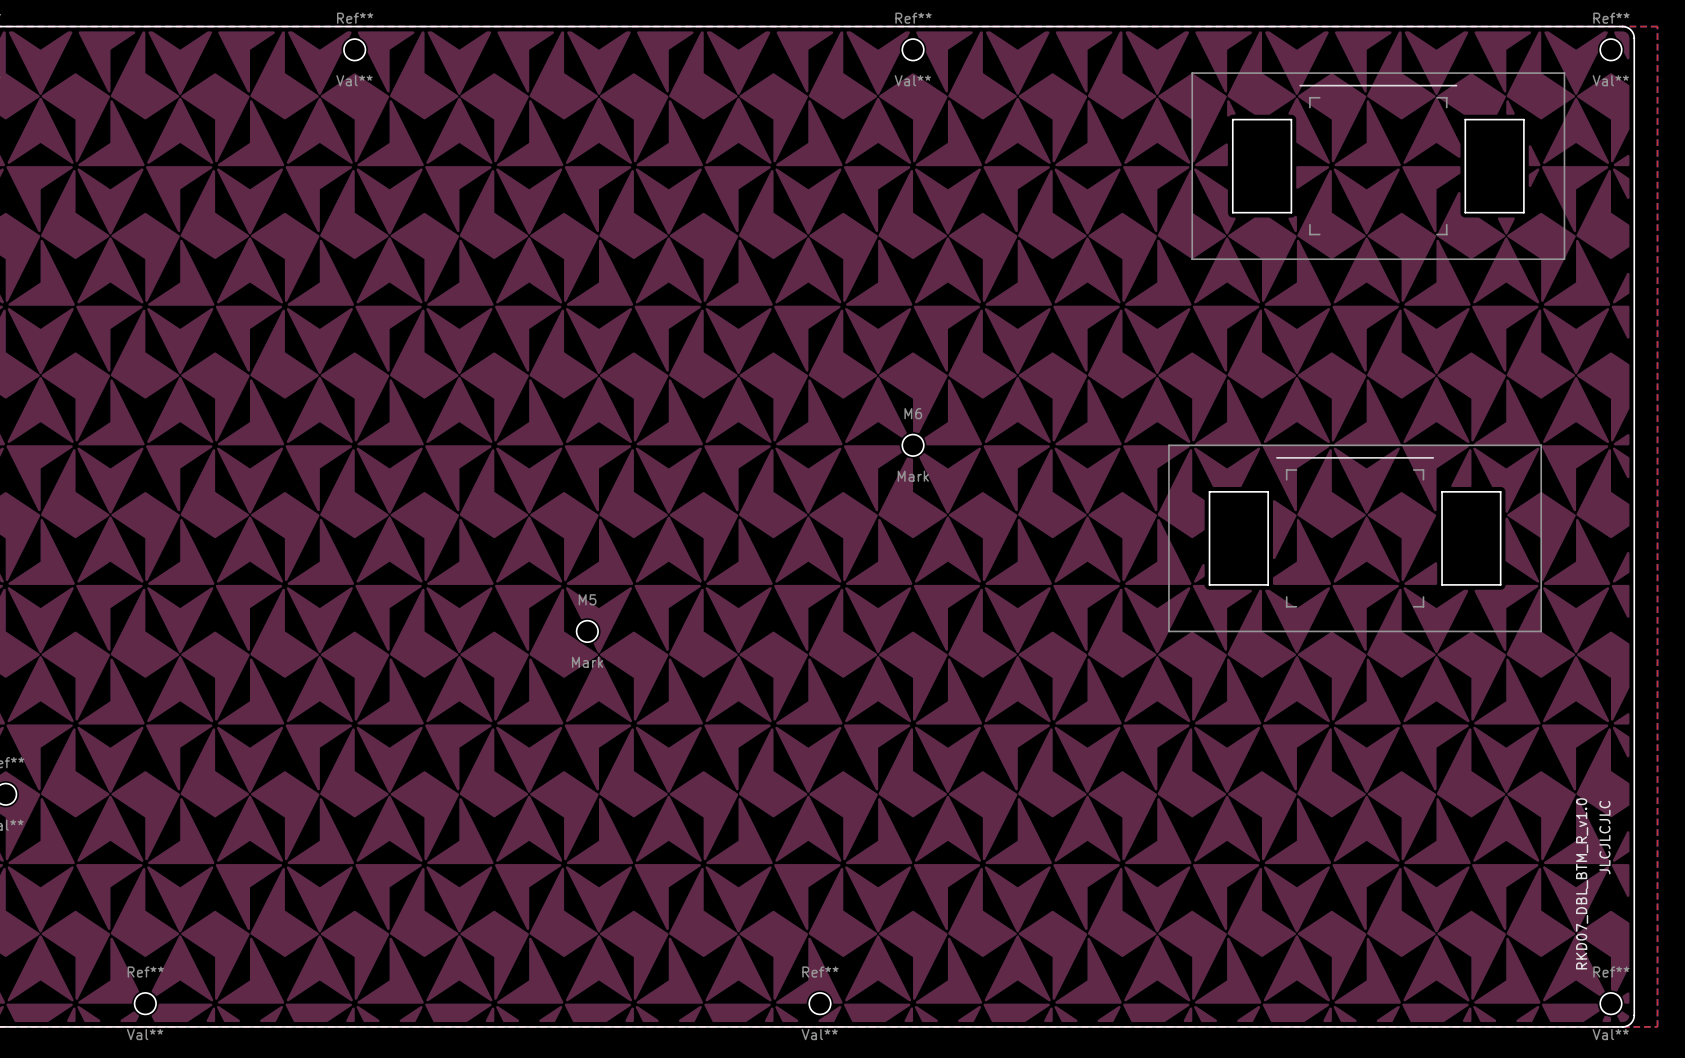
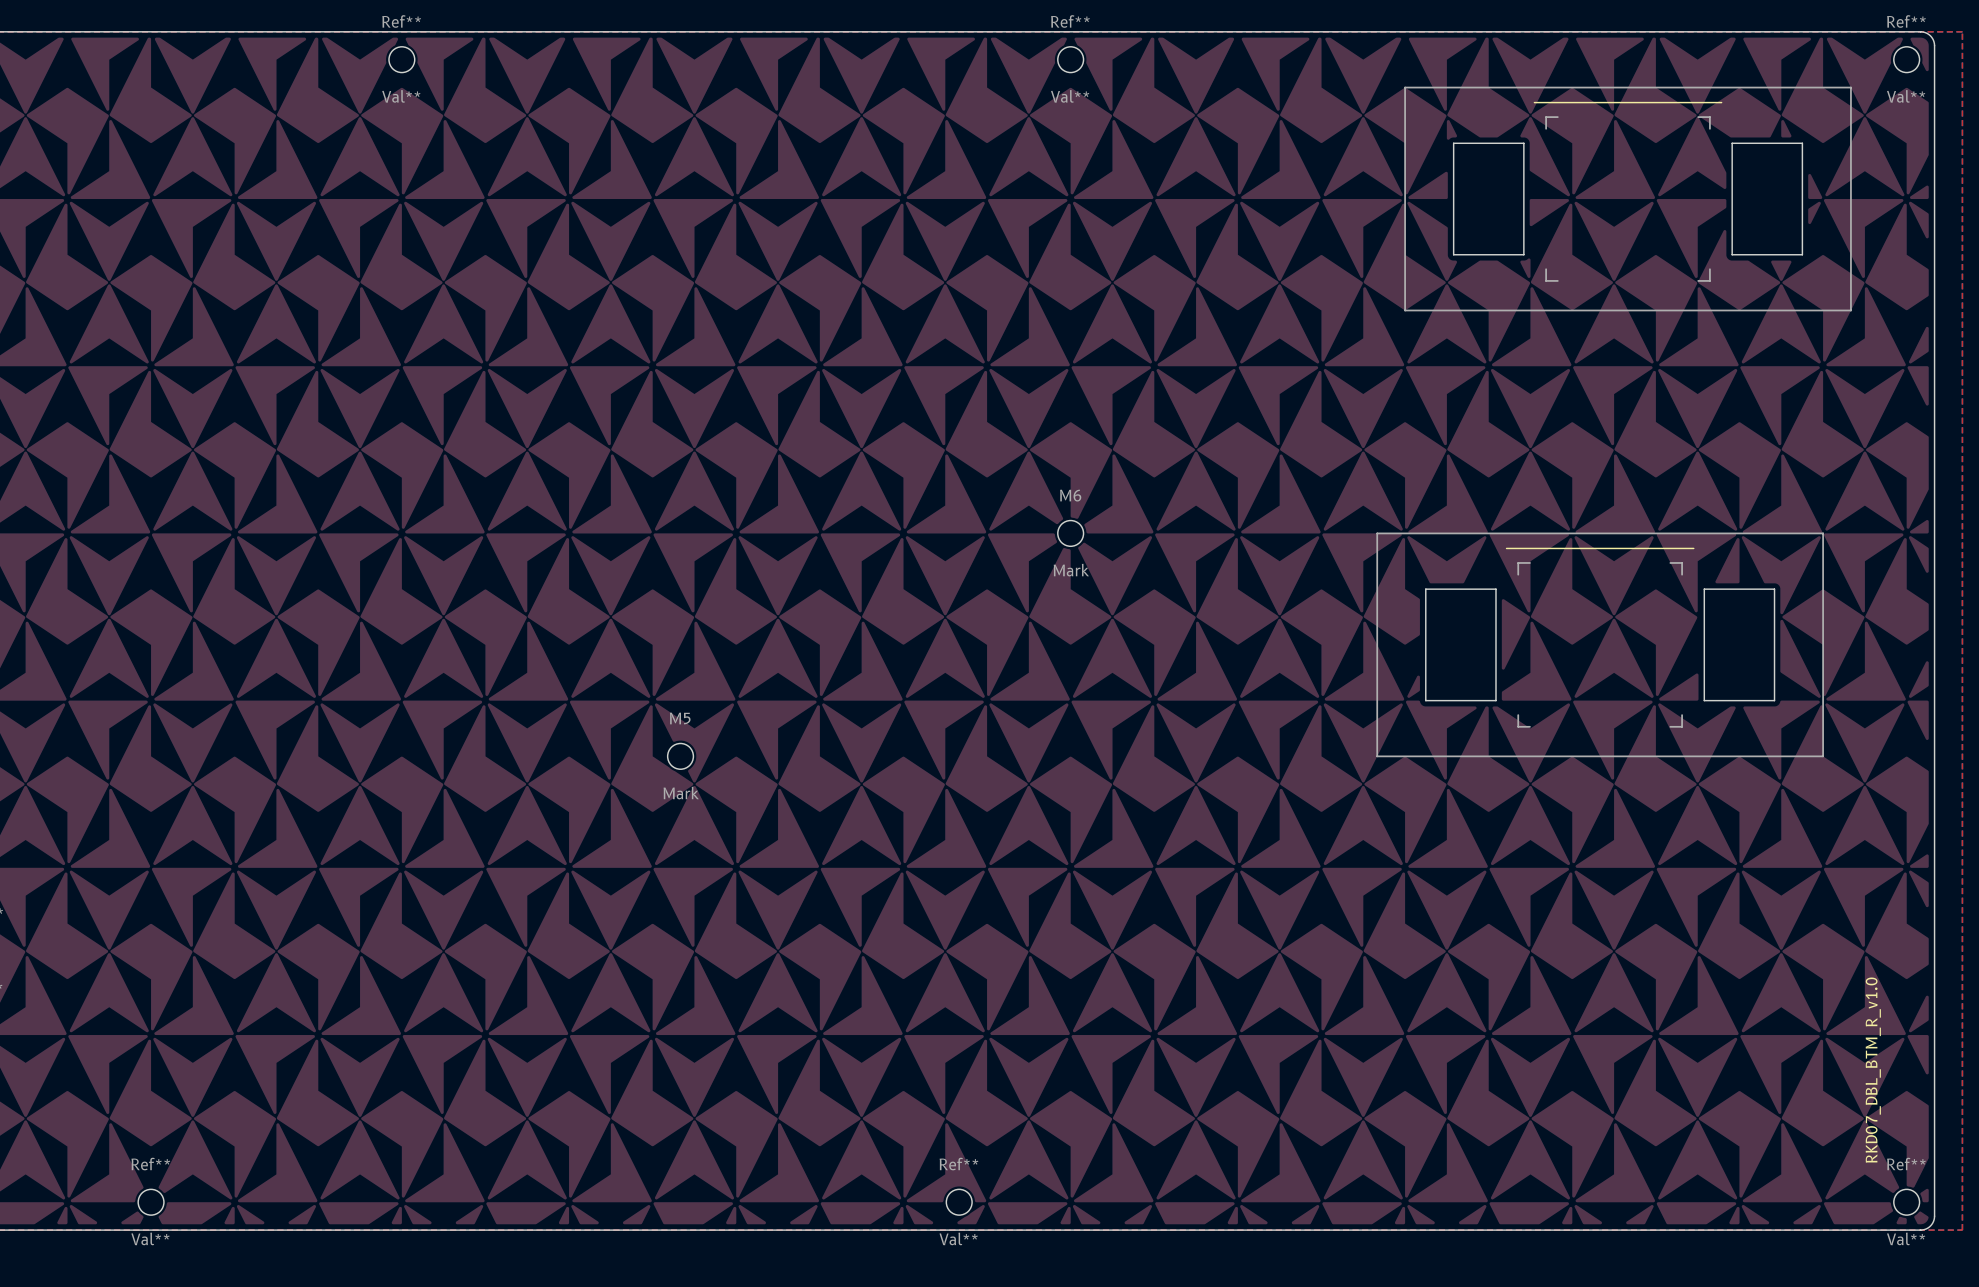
text: JLCJLCJLC (1604, 837) -> none

